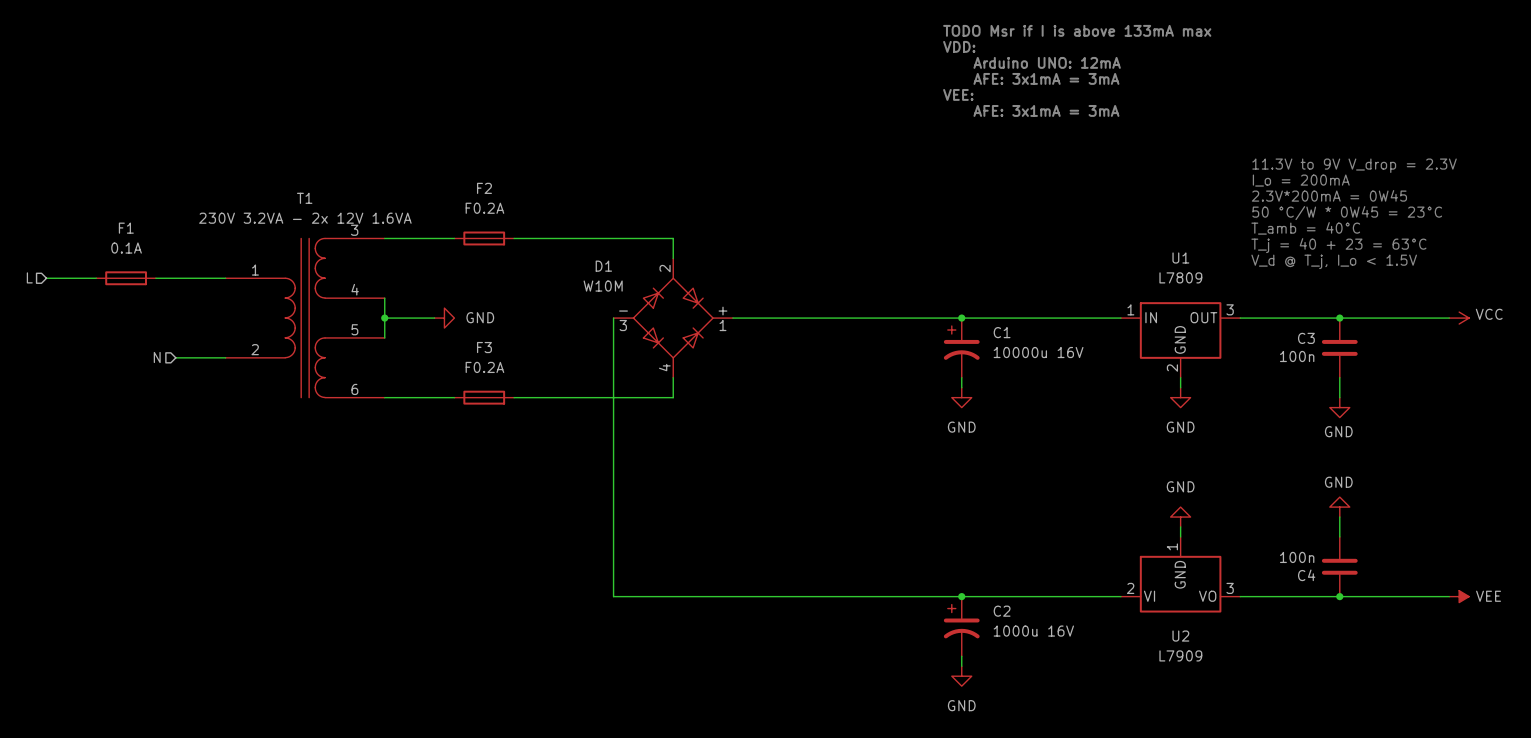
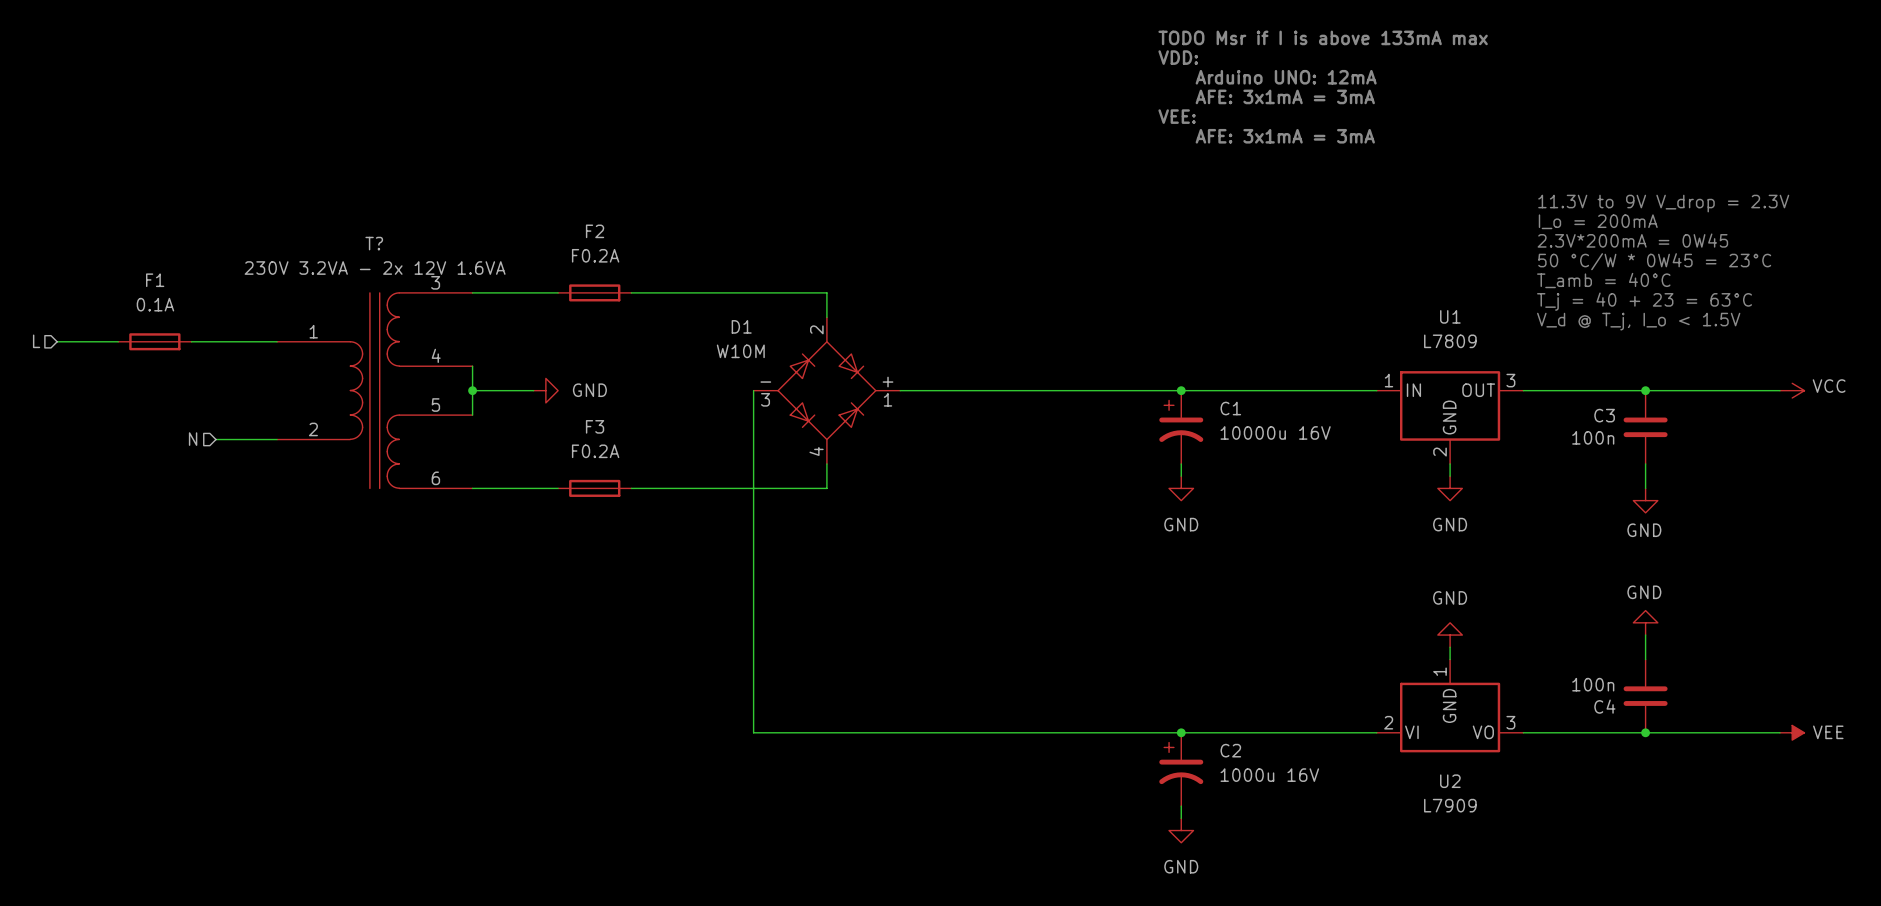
T1 name: T1 (304, 198) -> T? (374, 243)

